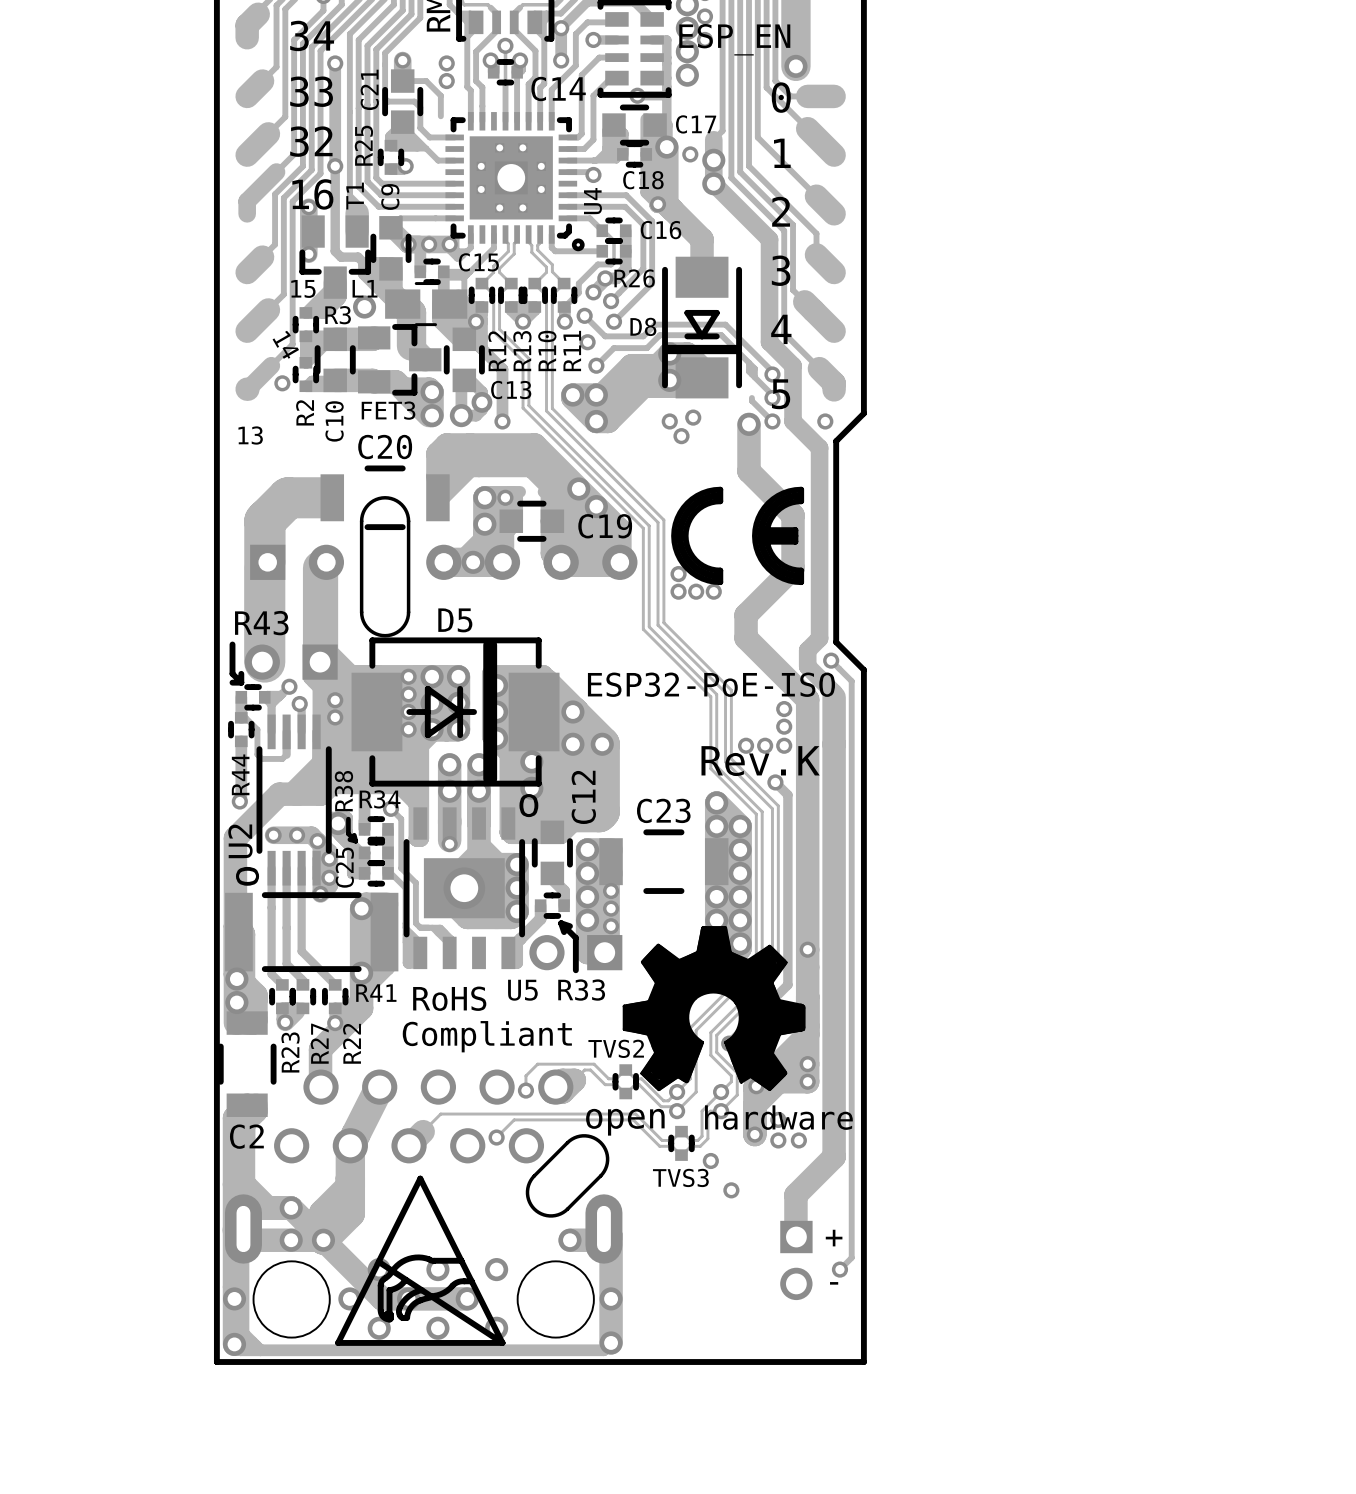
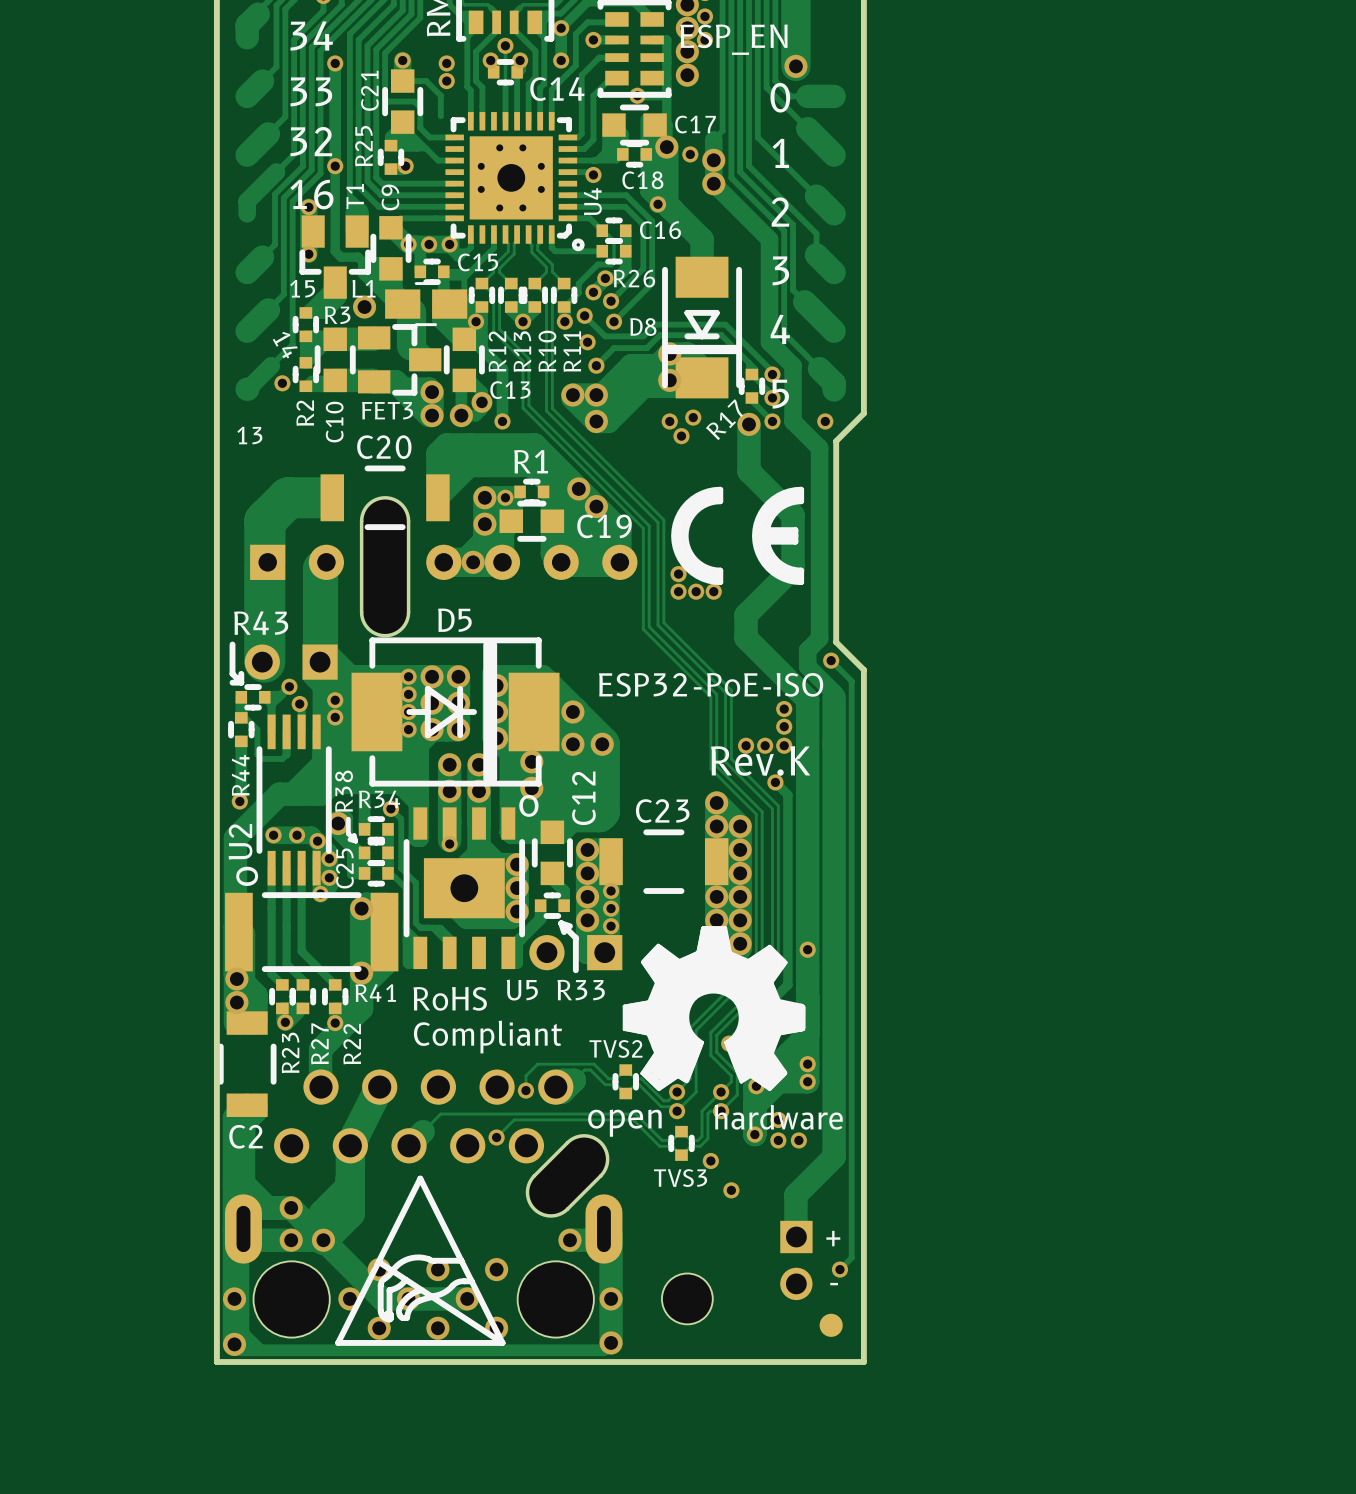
R17: none -> (751, 386)
R1: none -> (531, 491)
part: none -> (687, 1298)
part: none -> (831, 1325)

